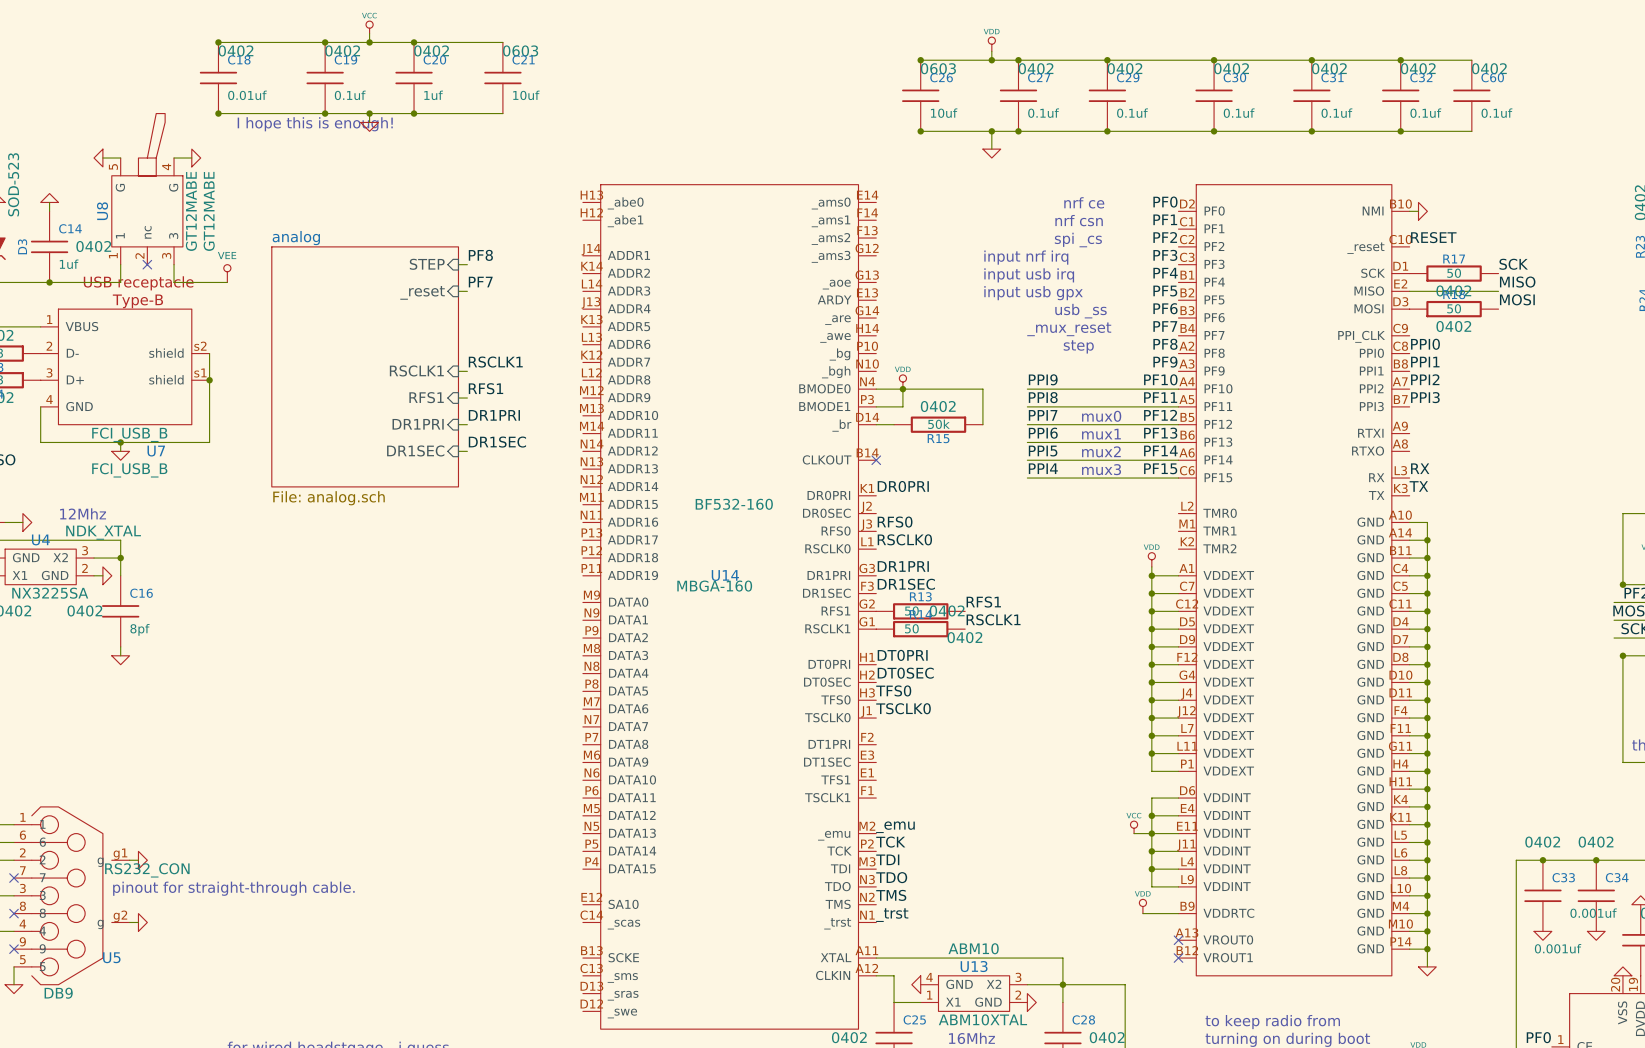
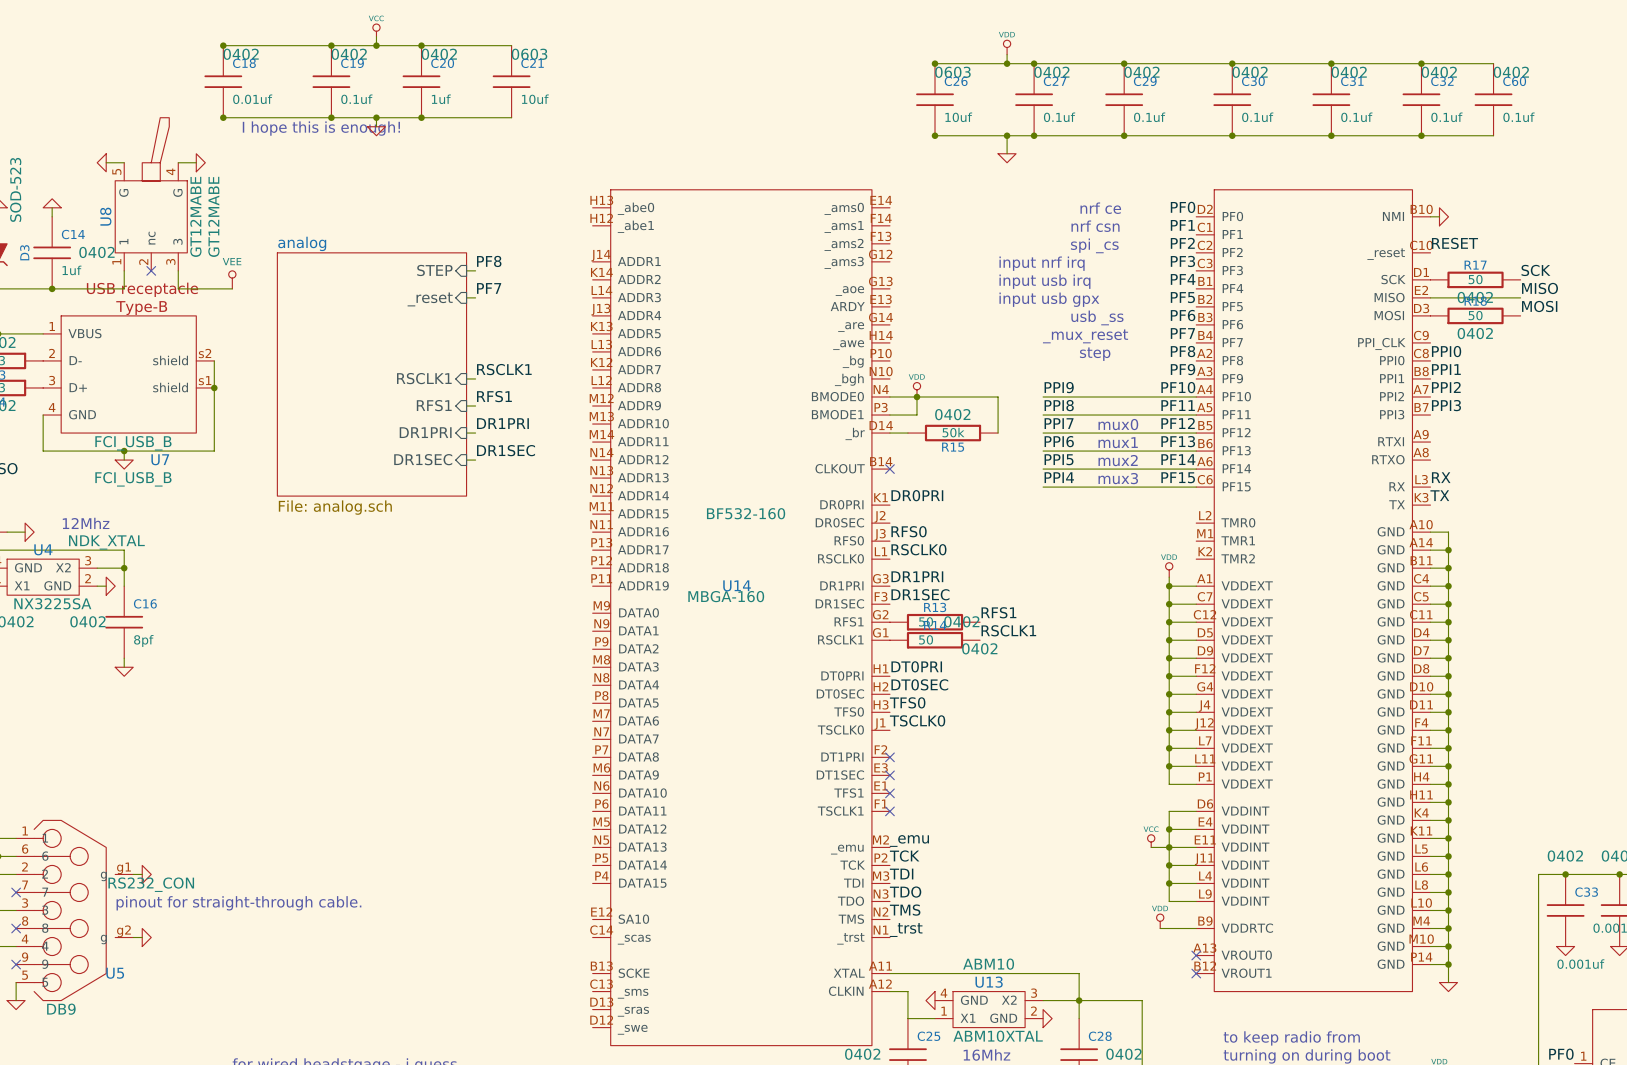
no-connect mark: none -> (889, 757)
no-connect mark: none -> (889, 775)
no-connect mark: none -> (889, 793)
no-connect mark: none -> (889, 811)

